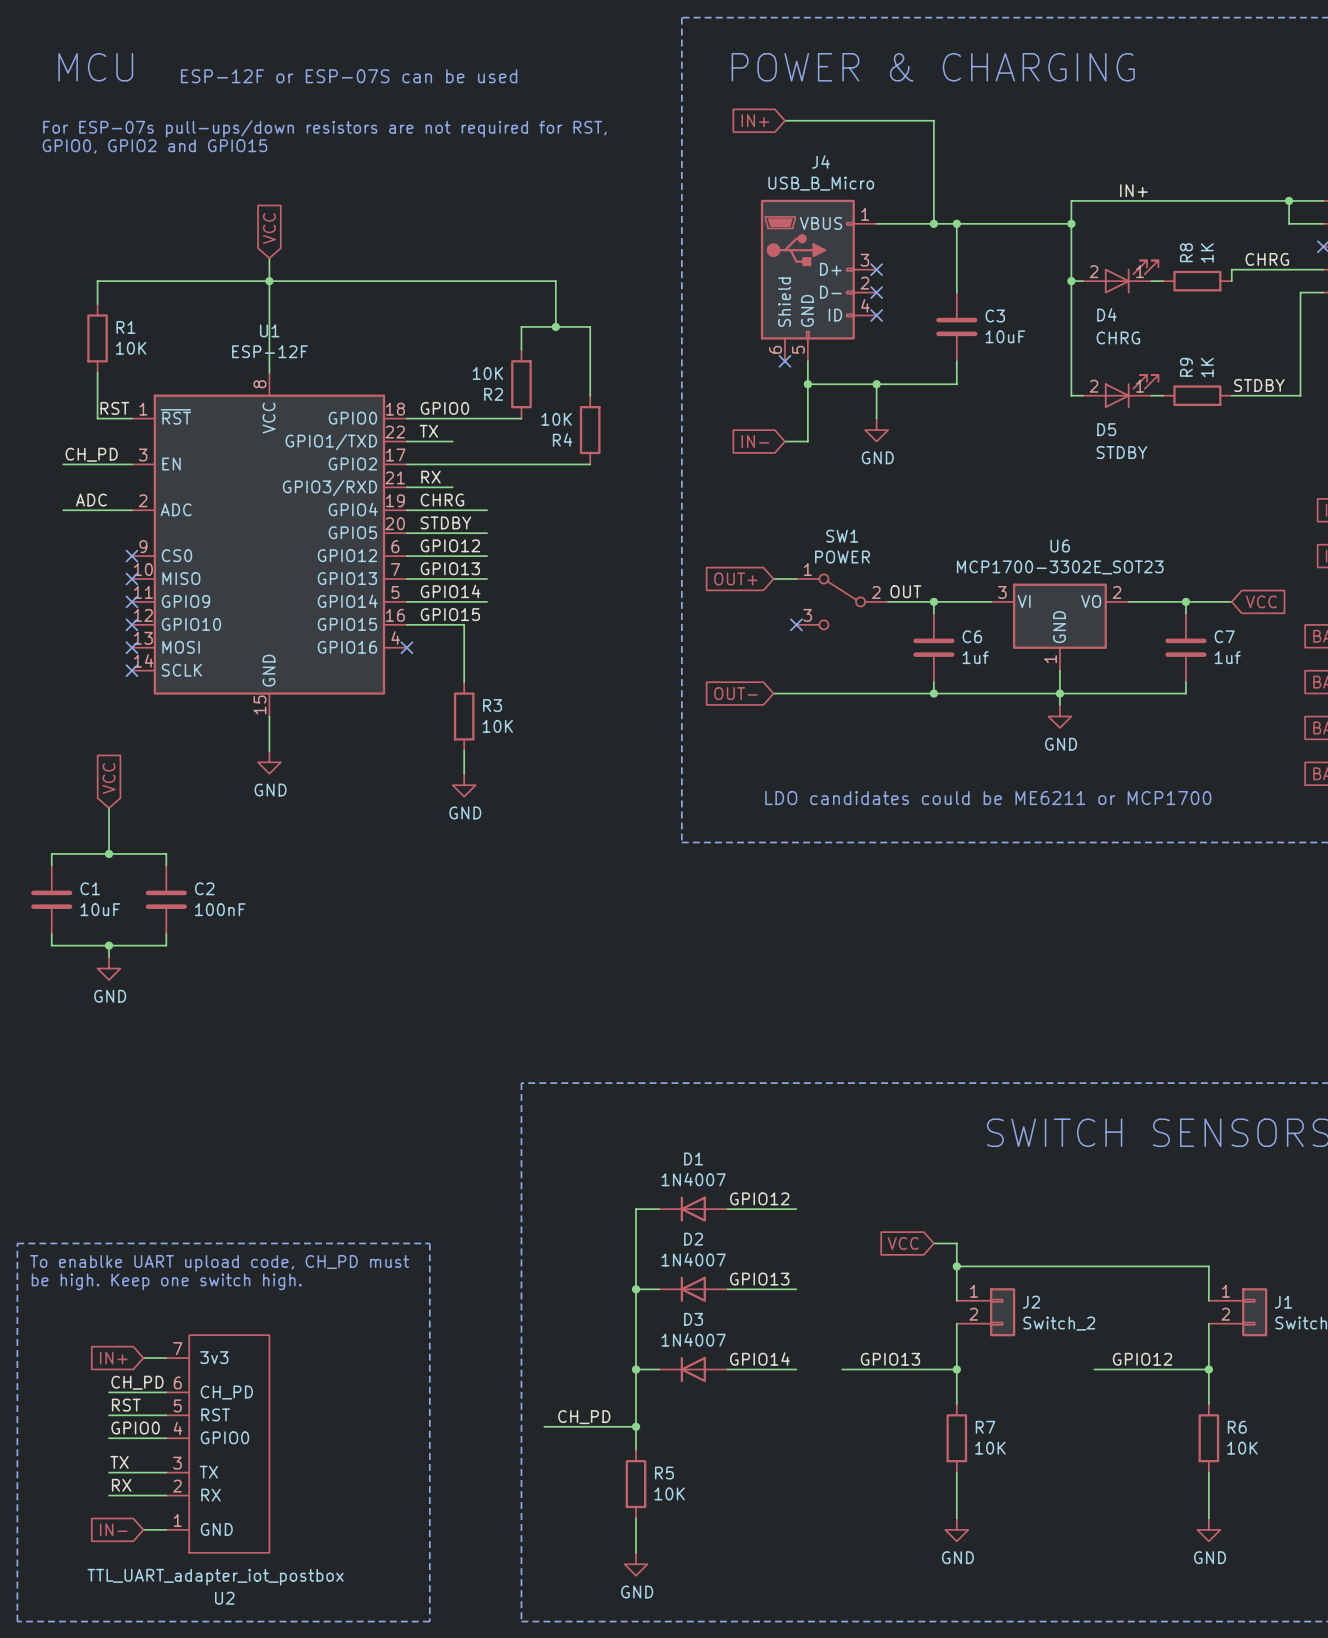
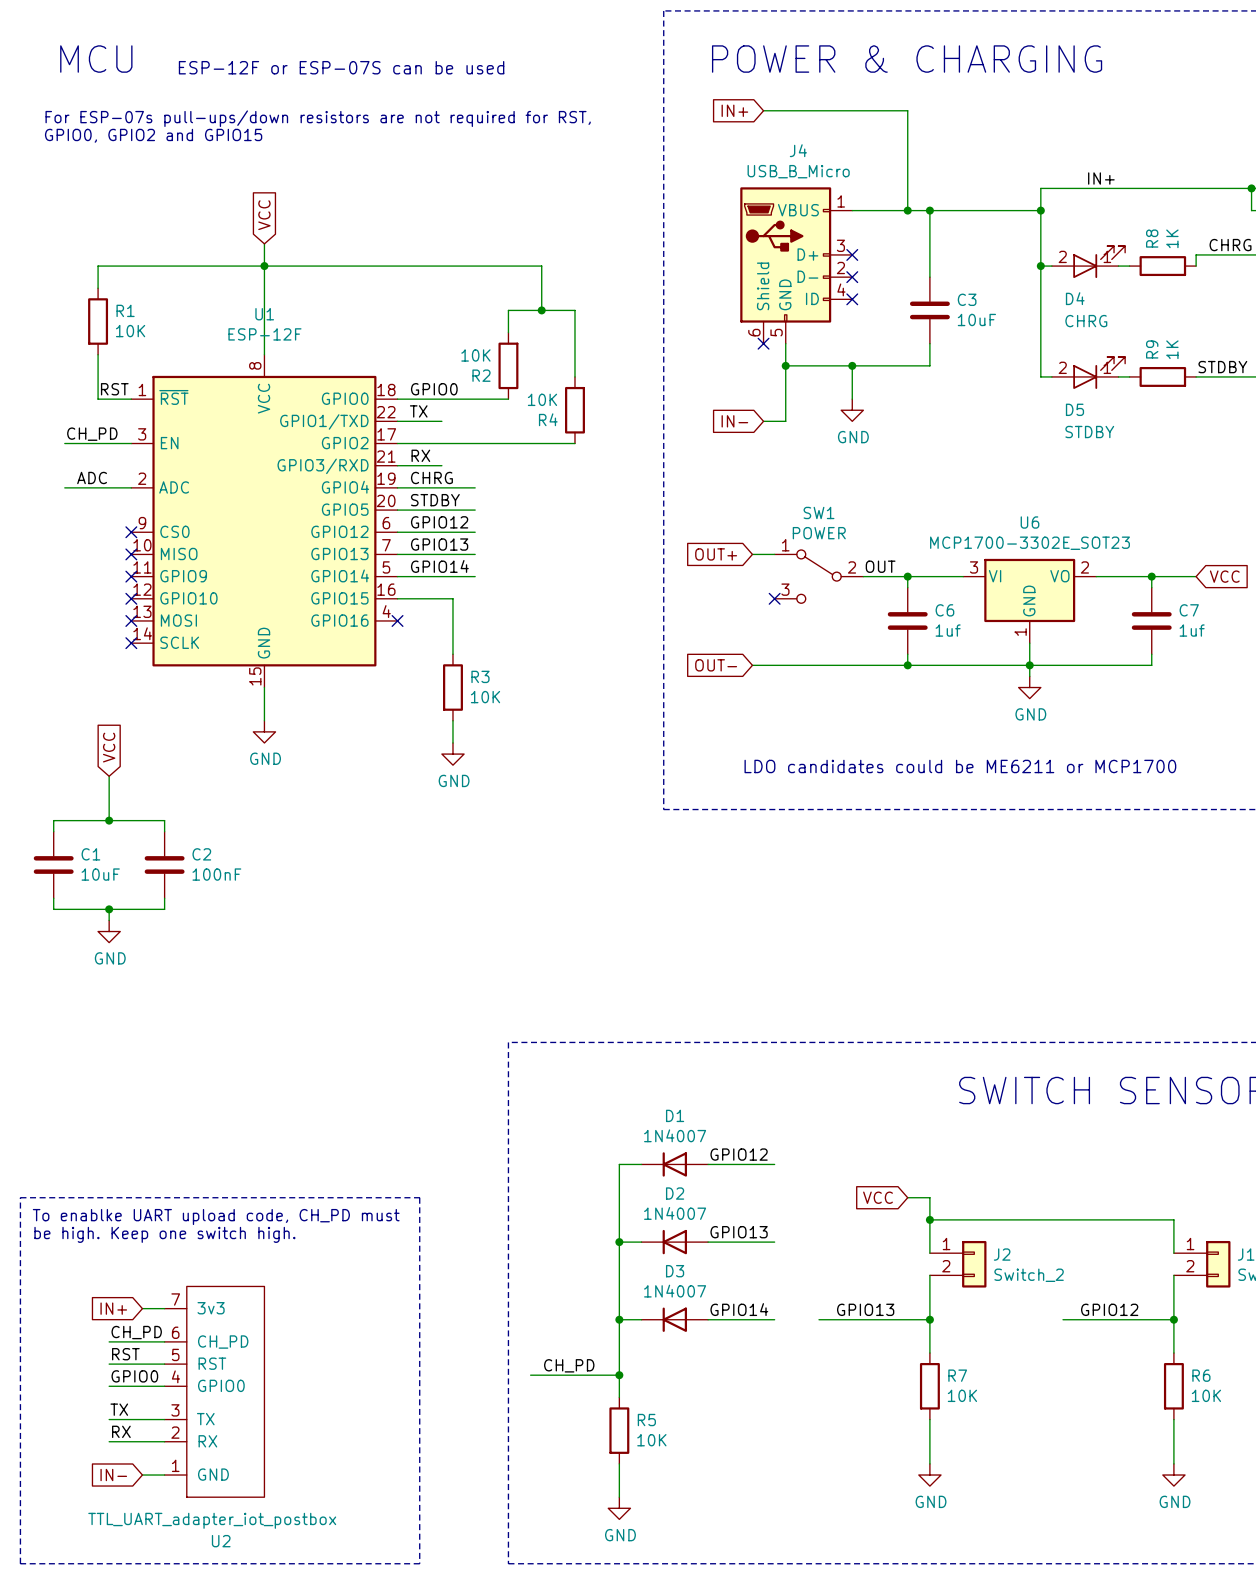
label: GPIO15 (450, 614) -> none

